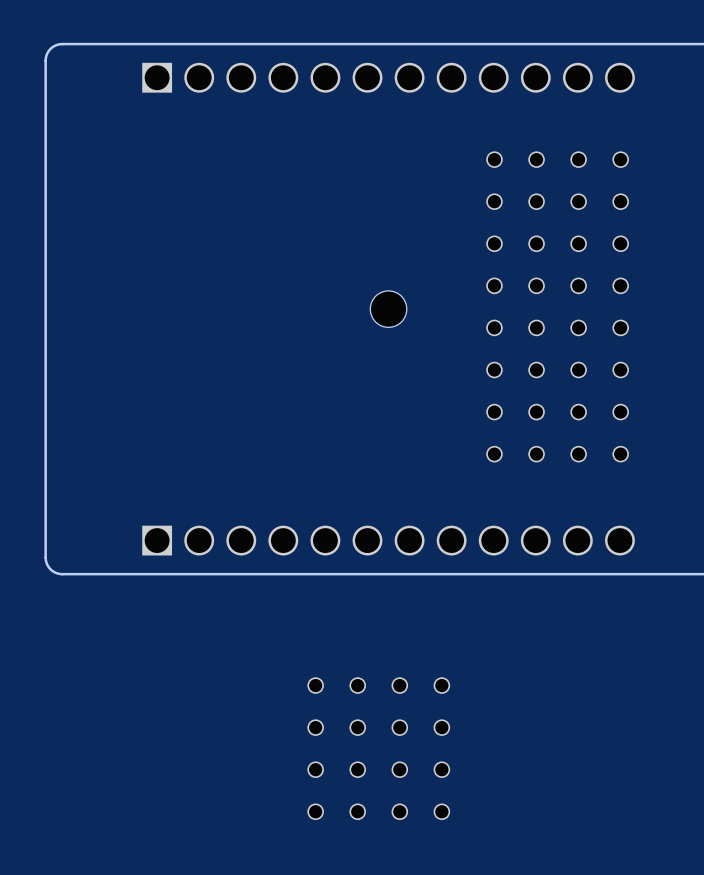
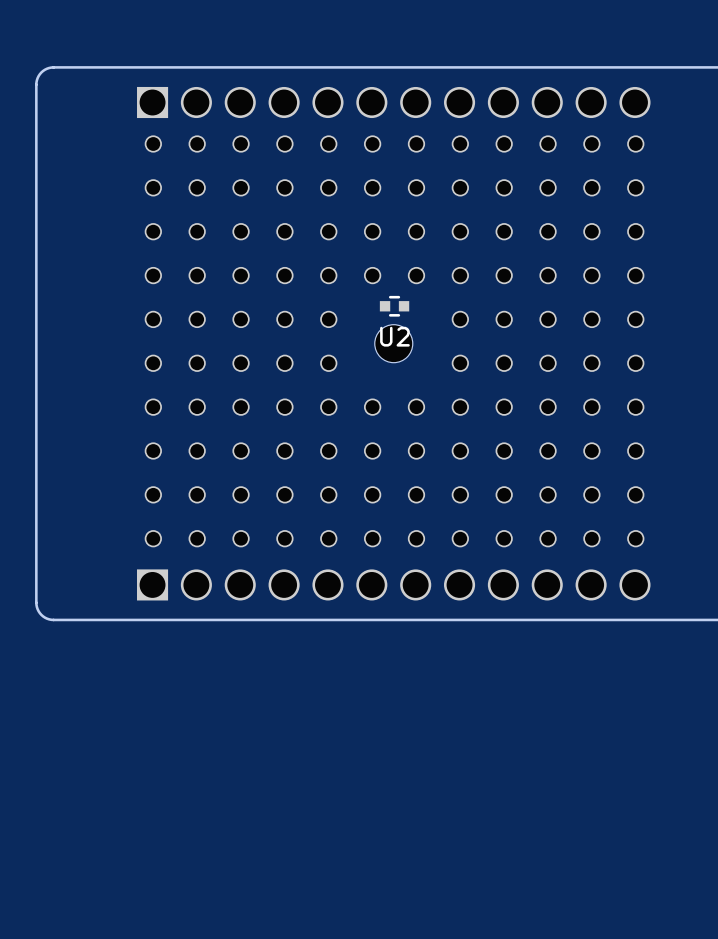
part: none -> (219, 143)
part: none -> (394, 143)
part: none -> (569, 143)
part: none -> (219, 253)
part: none -> (394, 253)
U2: none -> (394, 306)
part: none -> (219, 429)
part: none -> (394, 429)
part: none -> (219, 538)
part: none -> (394, 538)
part: none -> (569, 538)
part: (378, 748) -> none

